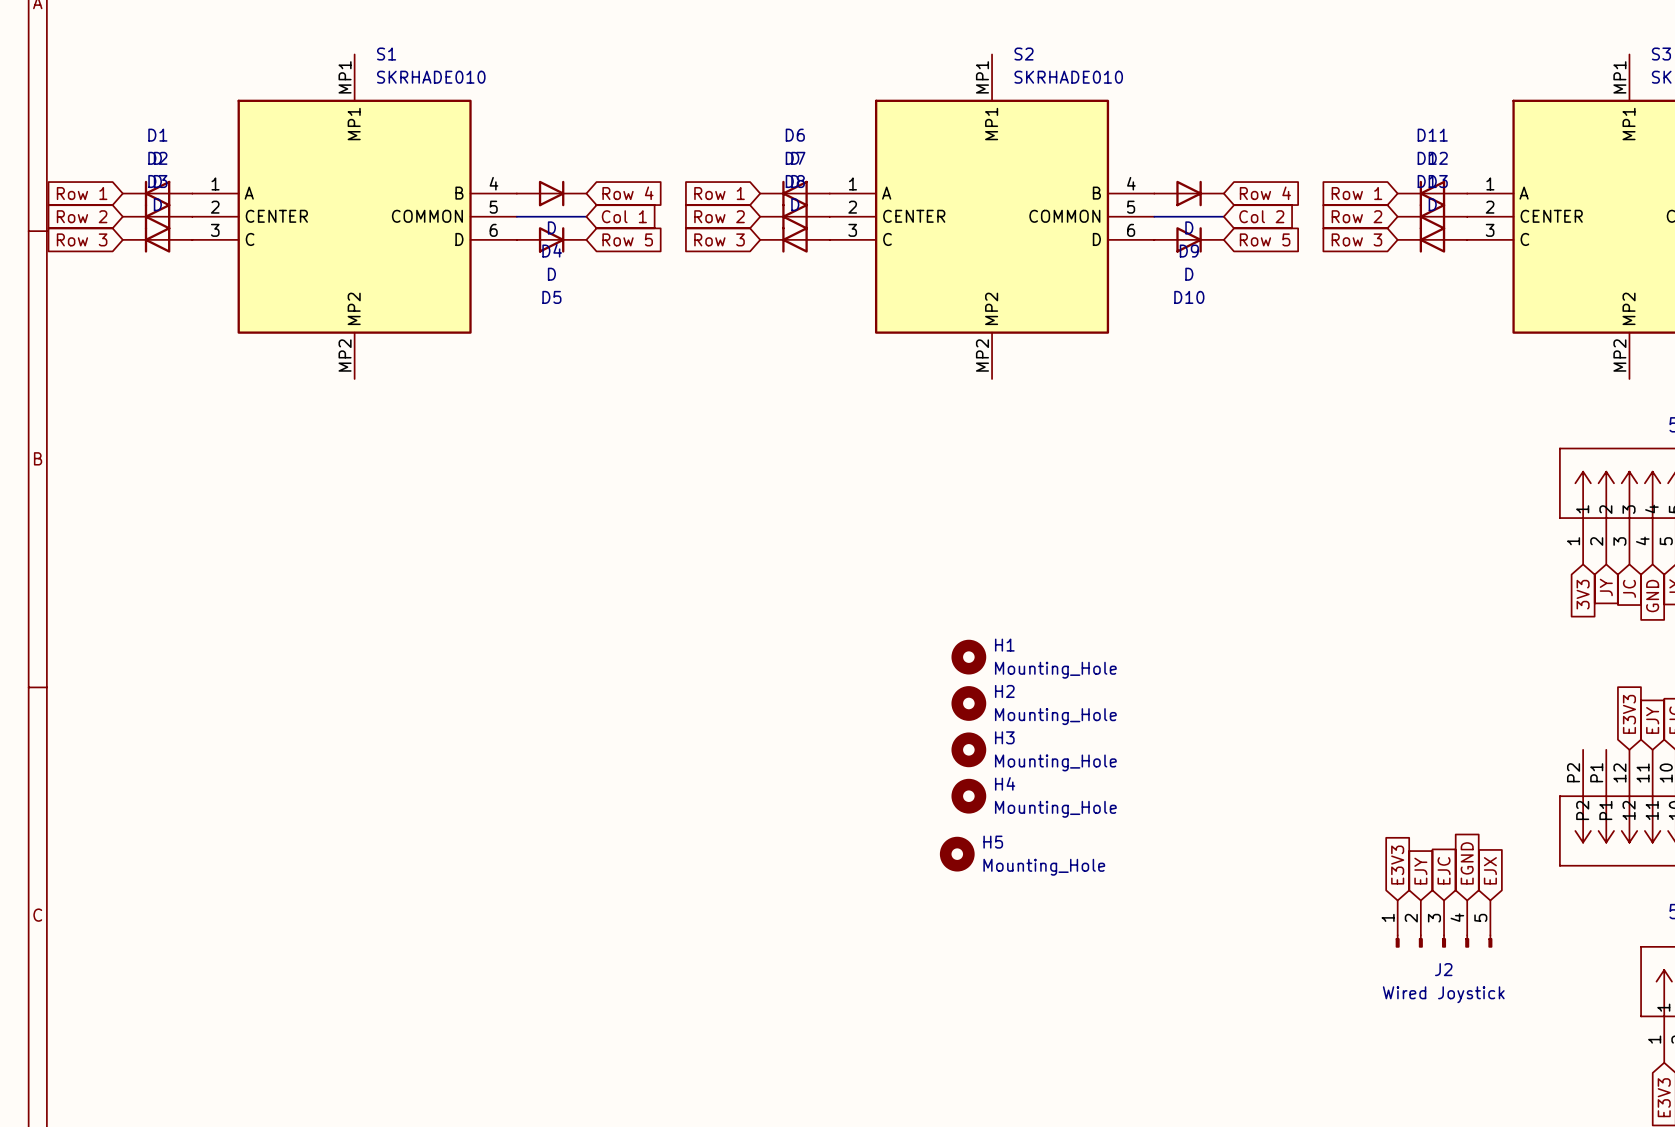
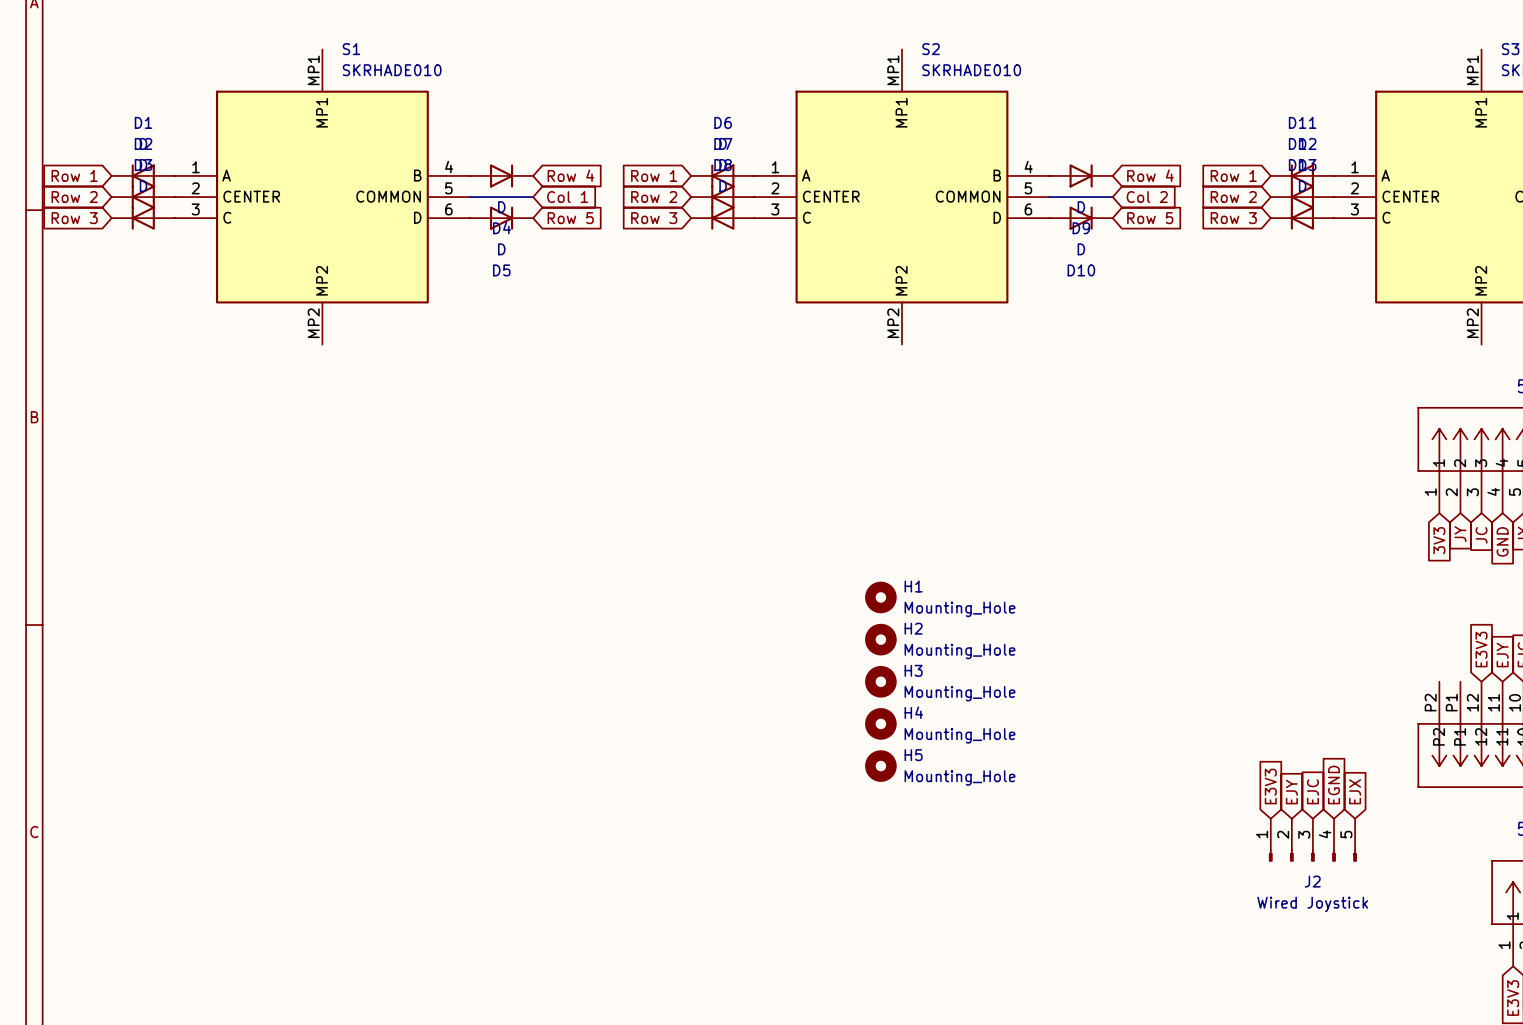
H5 position: (957, 854) -> (880, 766)

